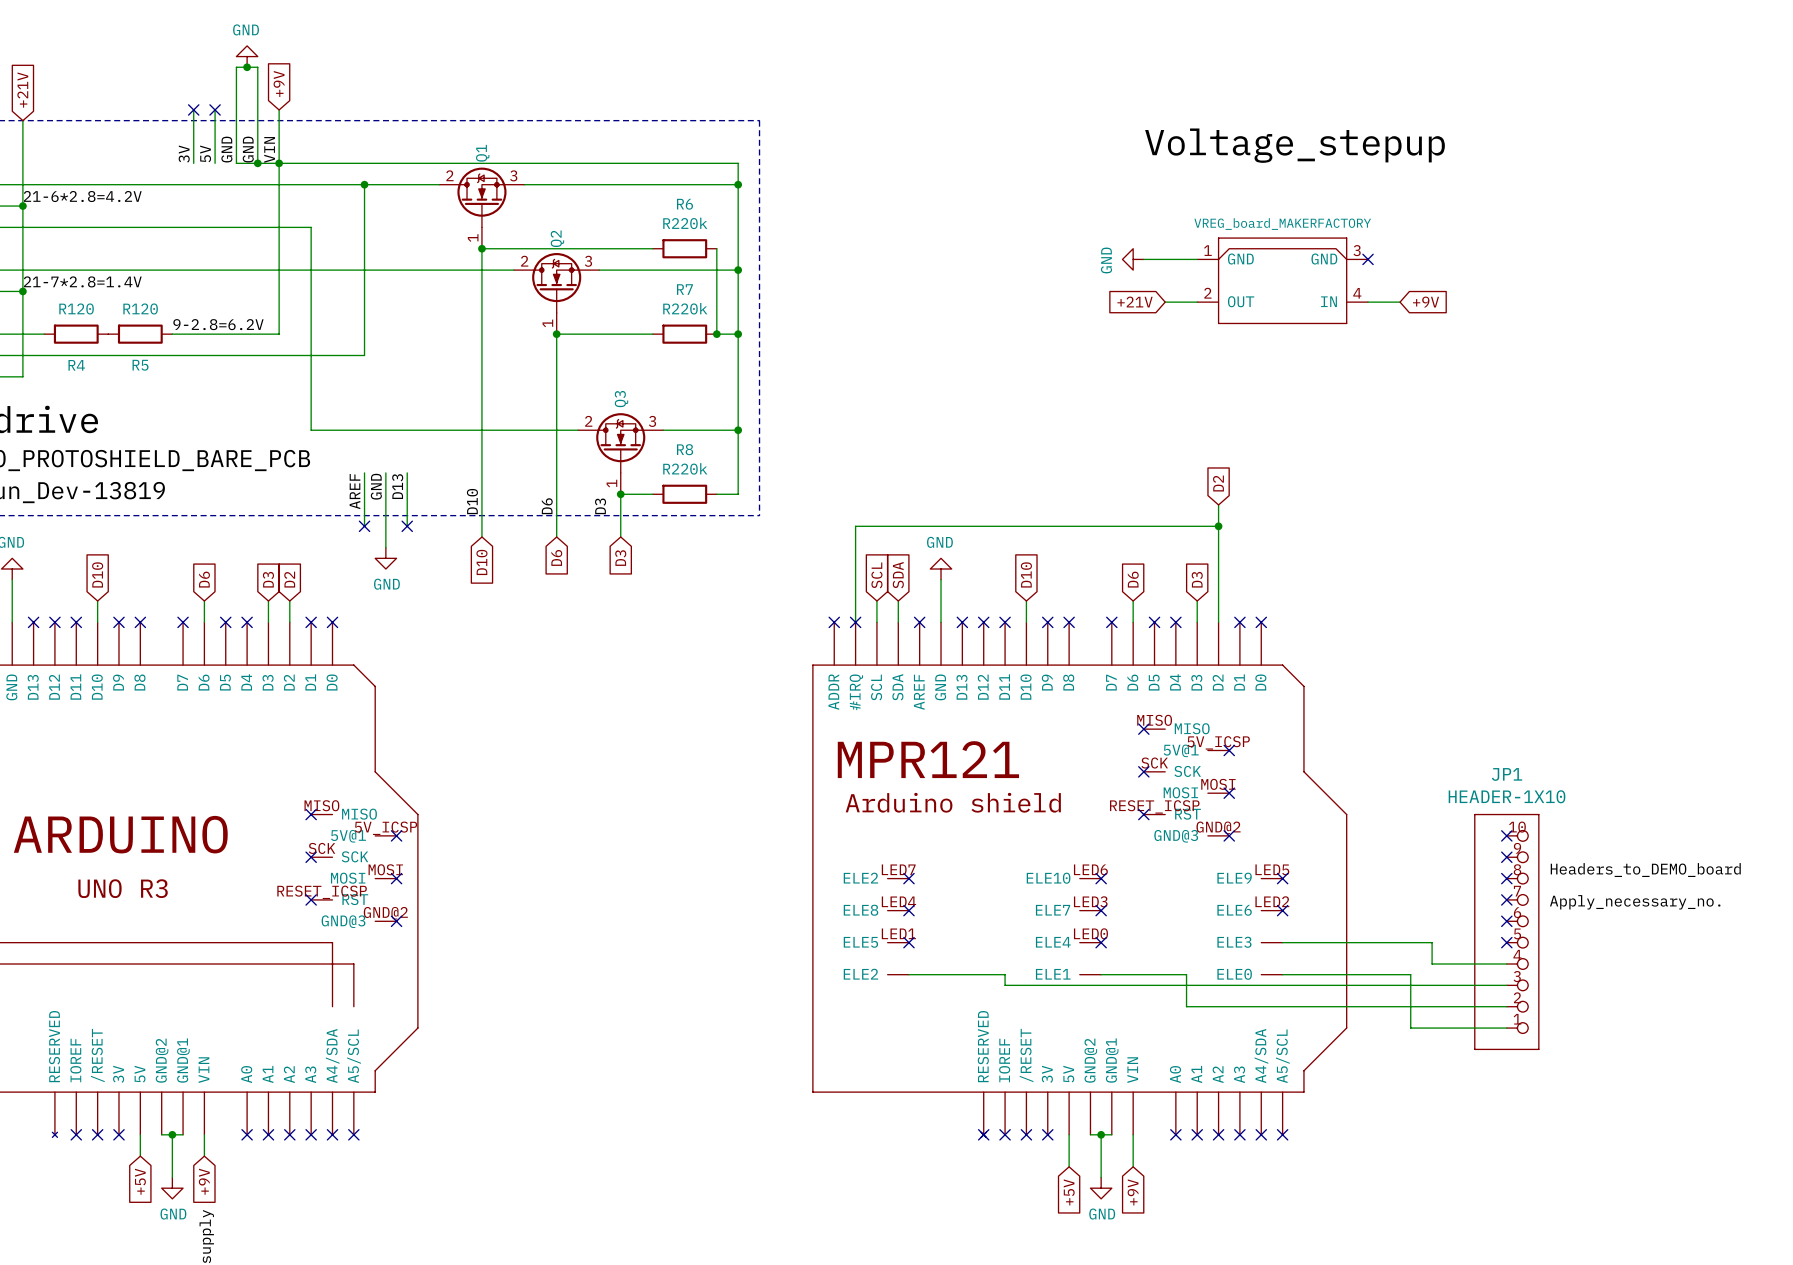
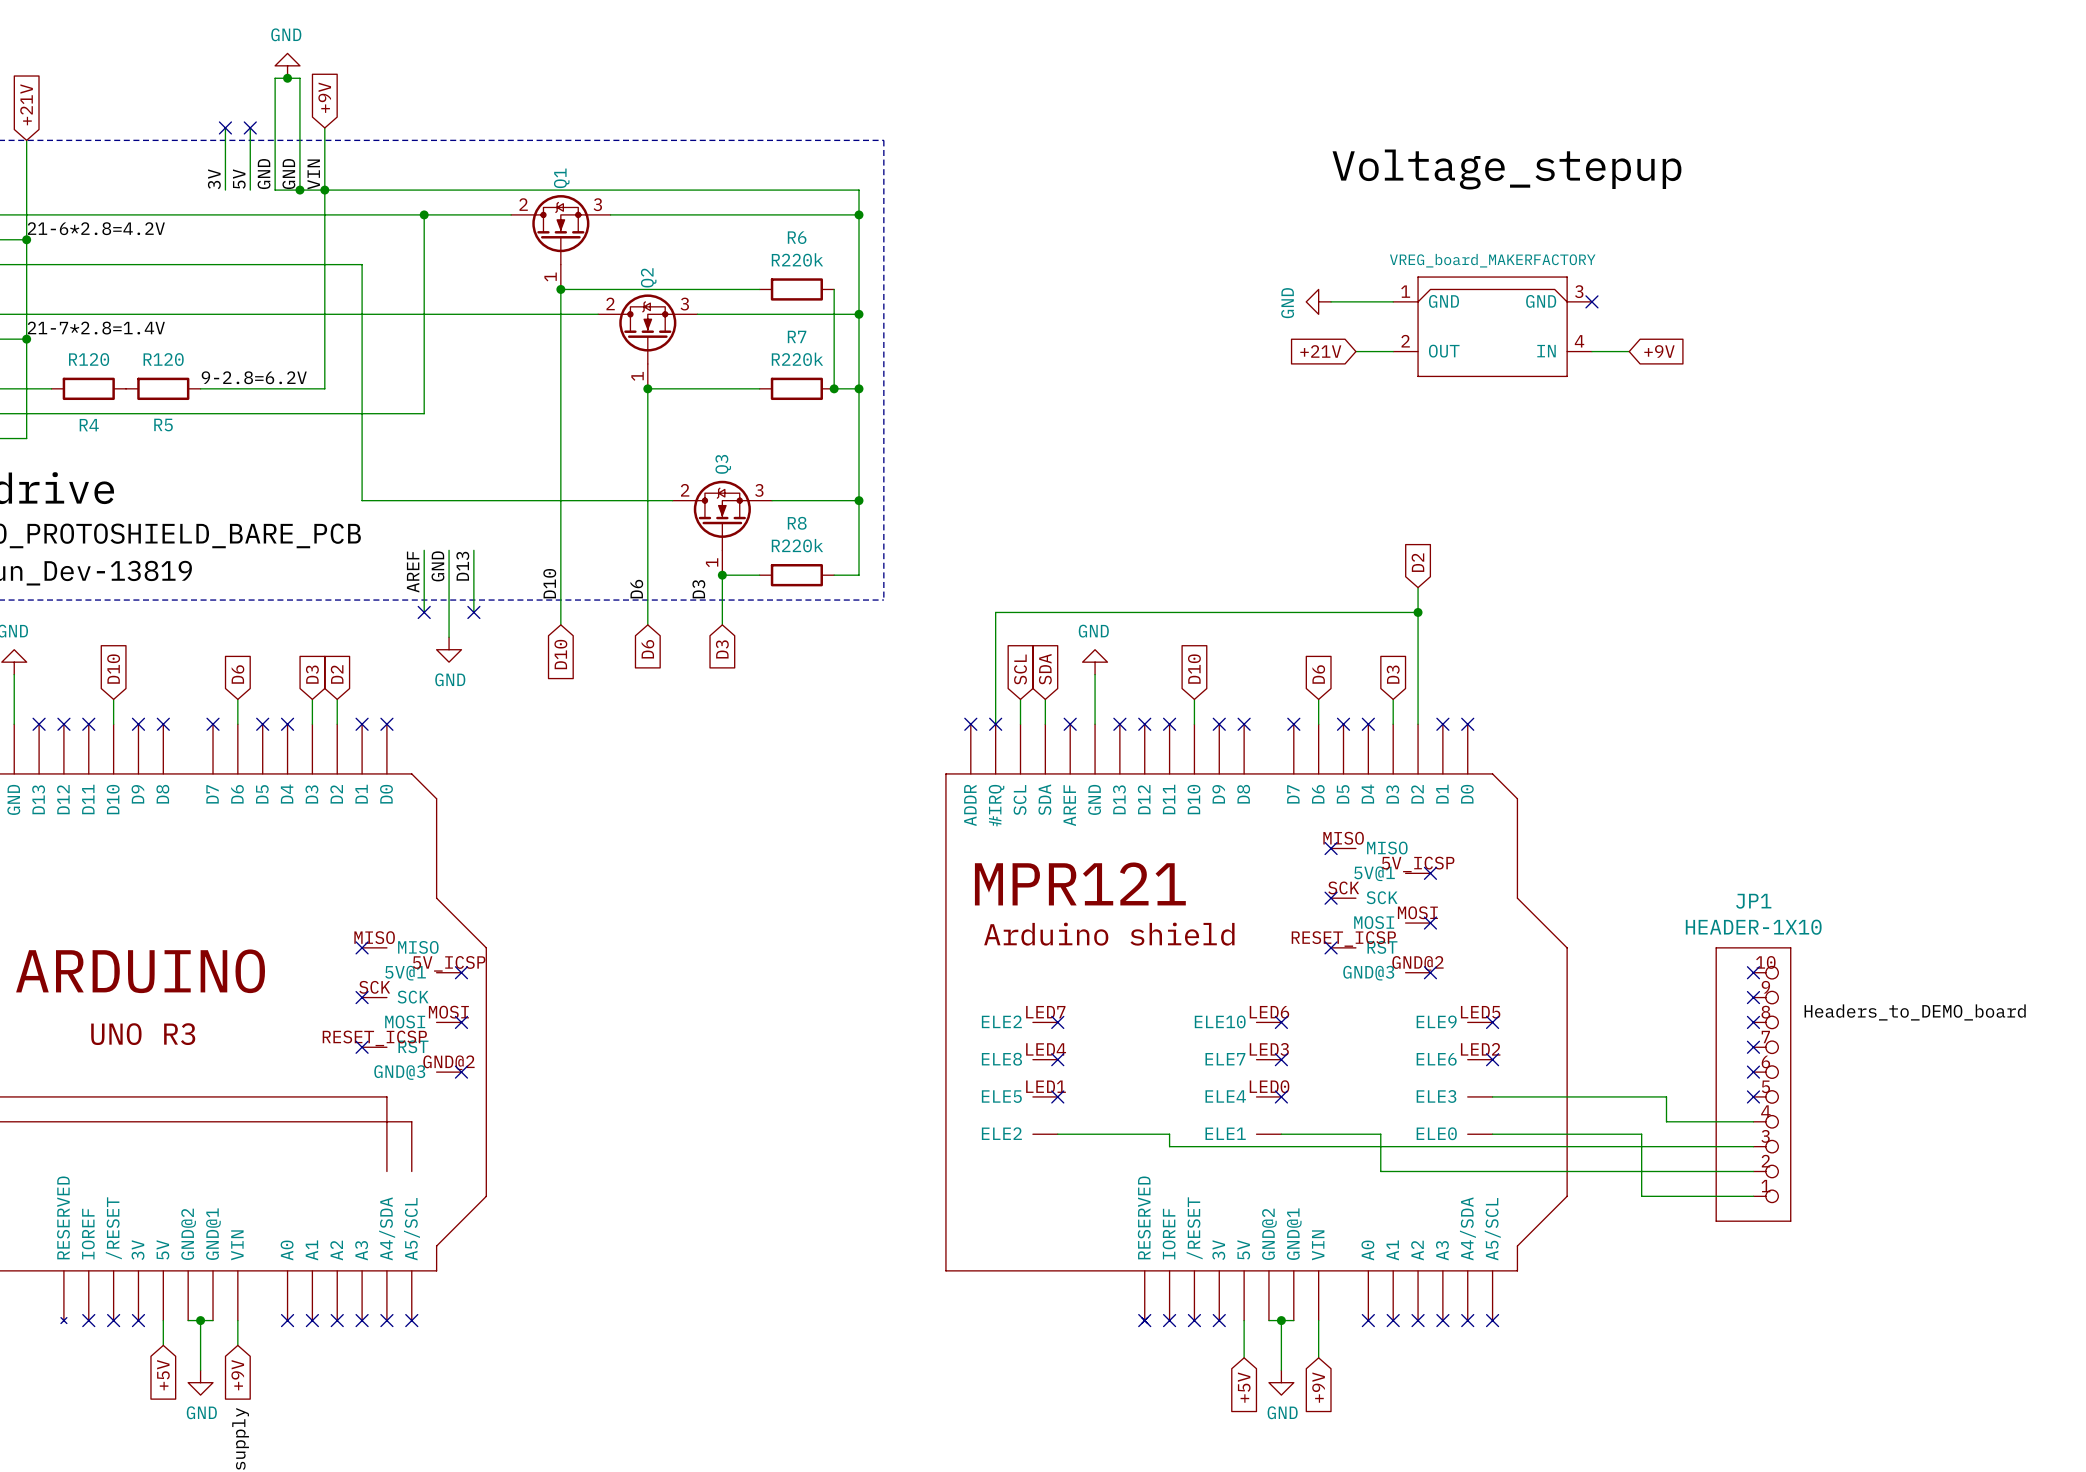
label: Apply_necessary_no. (1635, 902) -> none

